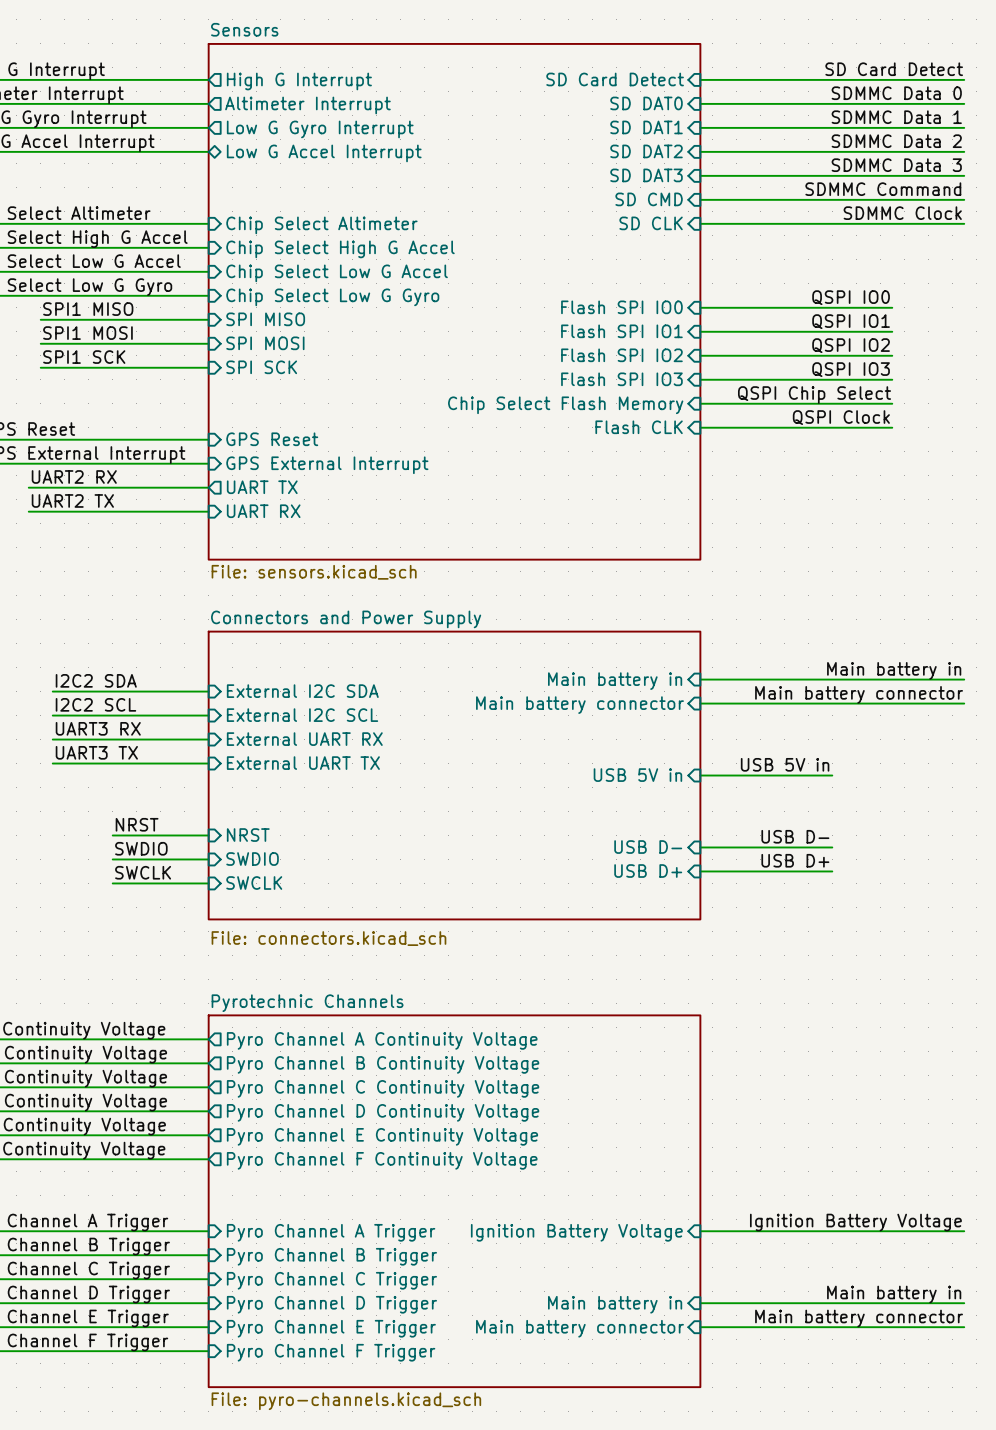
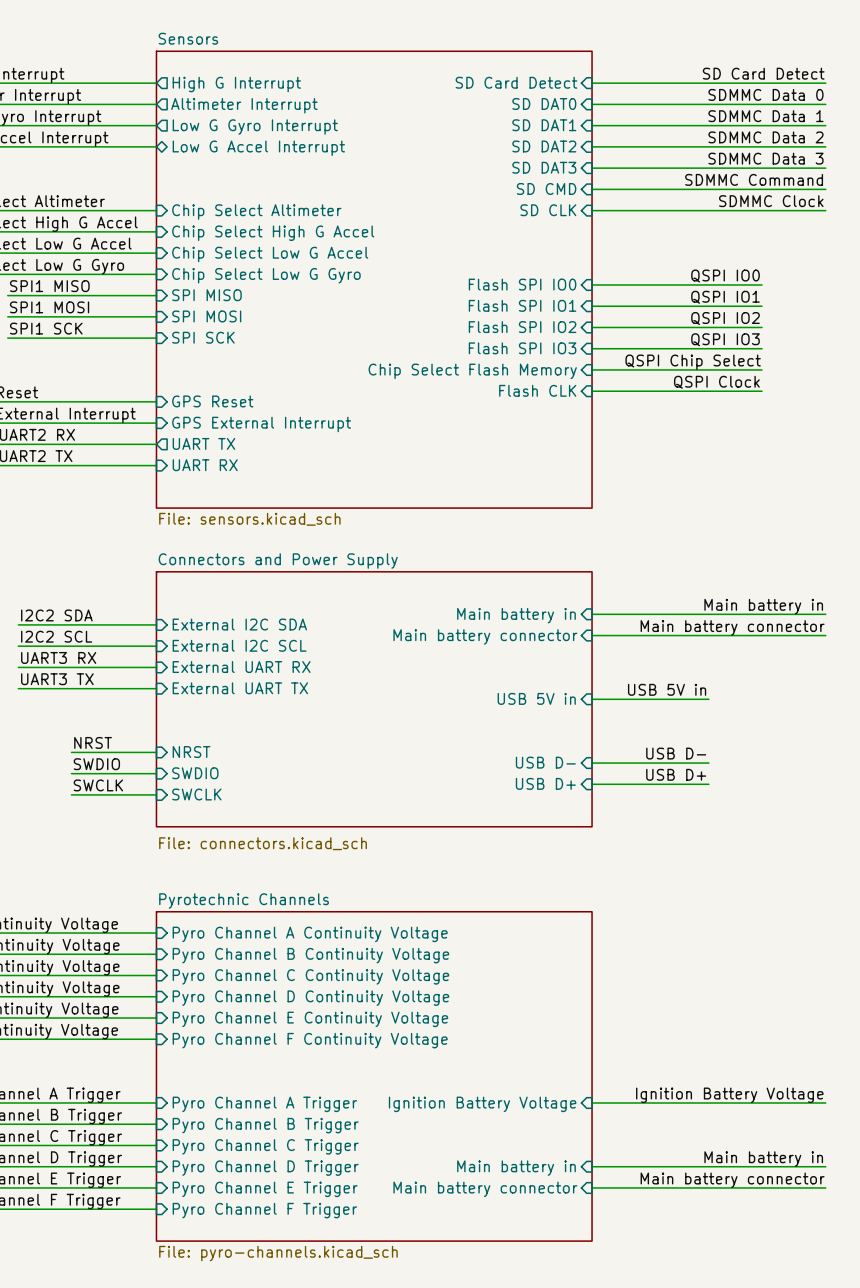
sheet pin shape: output (382, 1040) -> input (310, 934)
sheet pin shape: output (383, 1064) -> input (310, 955)
sheet pin shape: output (383, 1088) -> input (310, 976)
sheet pin shape: output (383, 1112) -> input (310, 998)
sheet pin shape: output (382, 1136) -> input (310, 1019)
sheet pin shape: output (382, 1160) -> input (310, 1040)

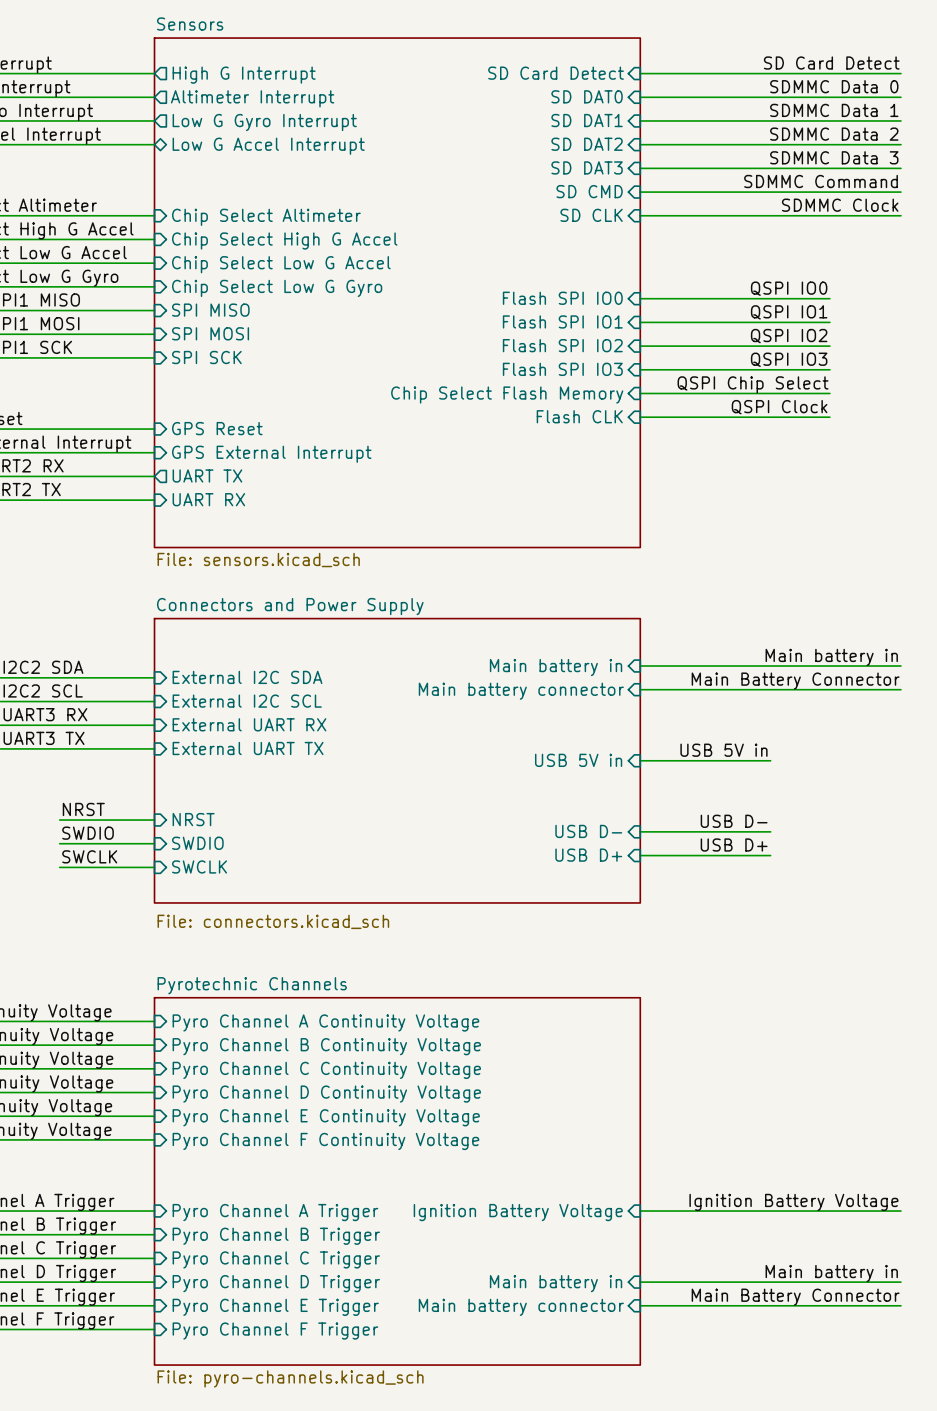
label: Main battery connector (732, 627) -> Main Battery Connector (795, 681)
label: Main battery connector (732, 1180) -> Main Battery Connector (795, 1297)

